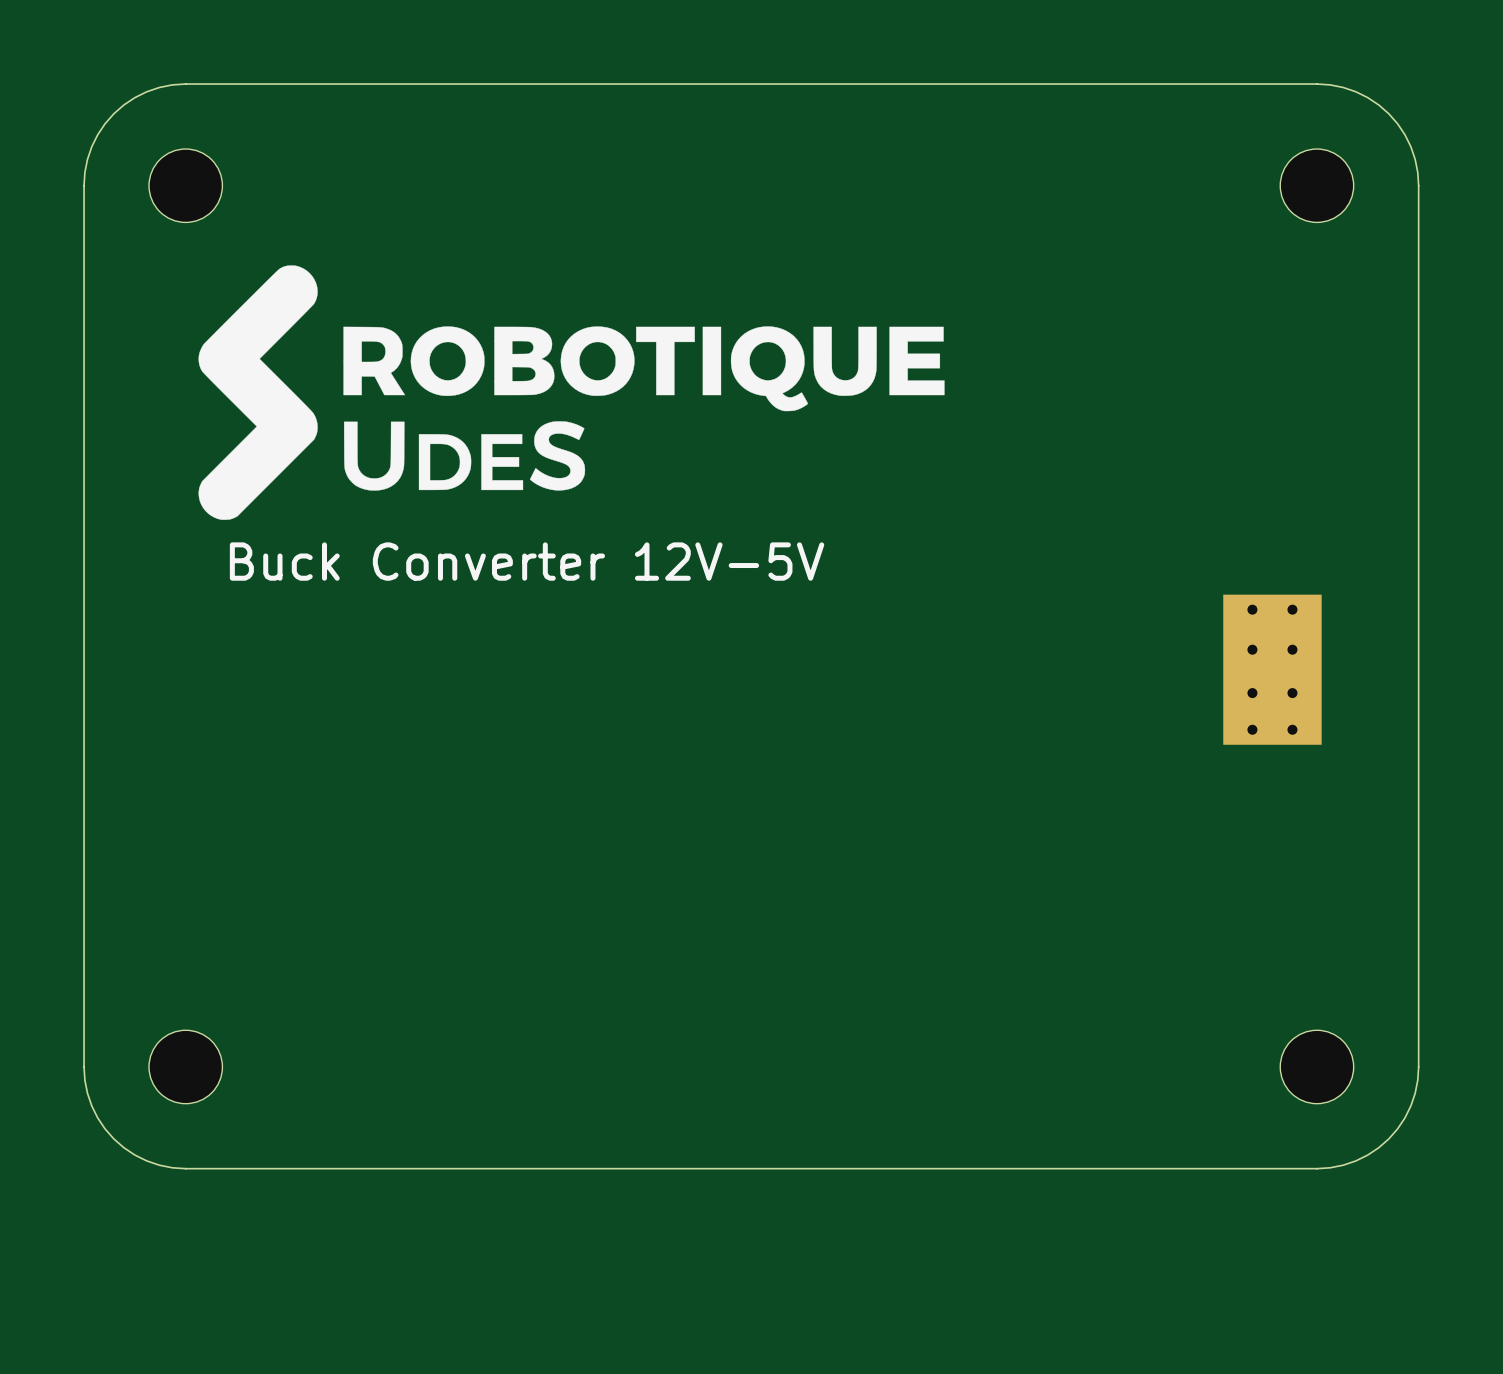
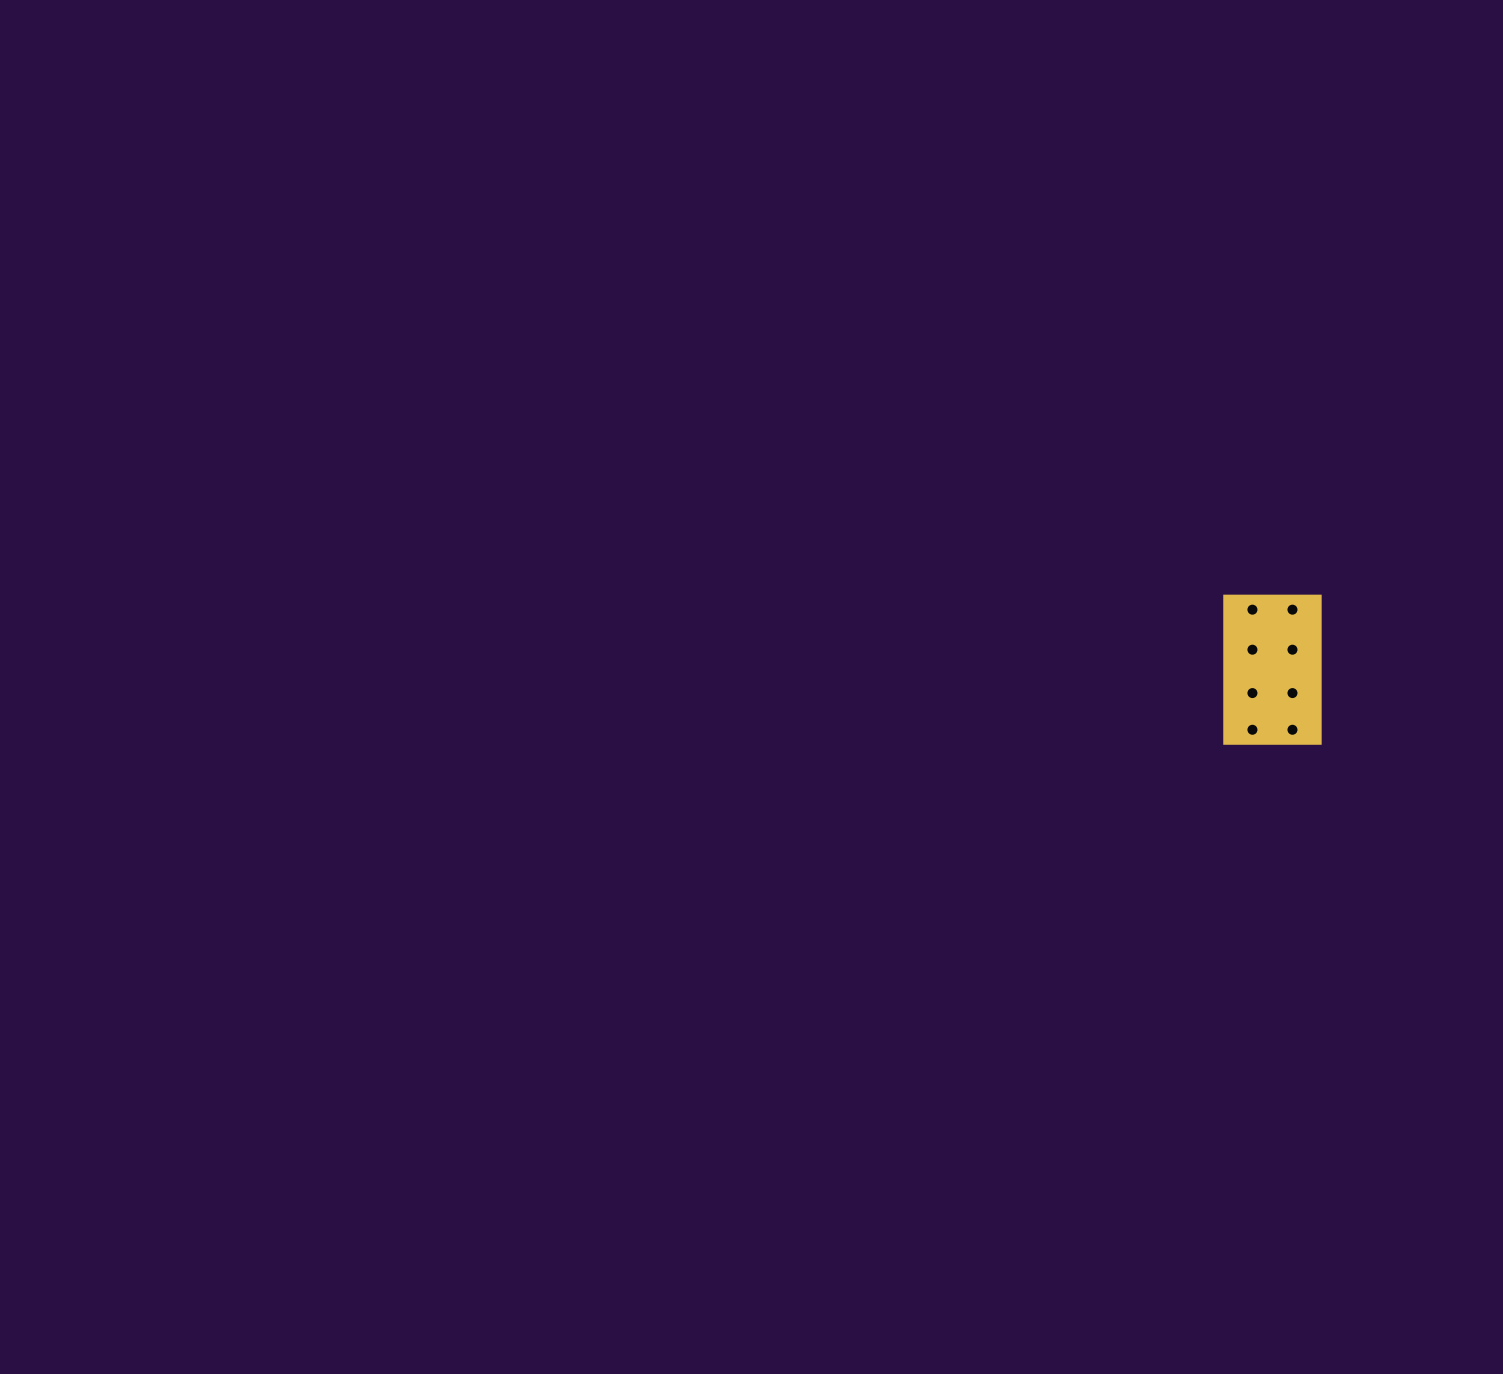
board edge: (1316, 84) (185, 84) (172, 84) (146, 91) (123, 105) (105, 123) (97, 134) (87, 159) (84, 185) (84, 1066) (87, 1093) (91, 1105) (105, 1128) (123, 1147) (146, 1160) (172, 1167) (185, 1168) (1316, 1168) (1343, 1165) (1355, 1160) (1378, 1147) (1397, 1128) (1405, 1117) (1415, 1093) (1418, 1066) (1418, 185) (1415, 159) (1410, 146) (1397, 123) (1388, 113) (1367, 97) (1355, 91) (1330, 84) (1316, 84) -> none
part: (185, 185) -> none
part: (1316, 185) -> none
drawing: [198, 265, 945, 520] -> none
text: Buck Converter 12V-5V (527, 561) -> none
part: (185, 1066) -> none
part: (1316, 1066) -> none

